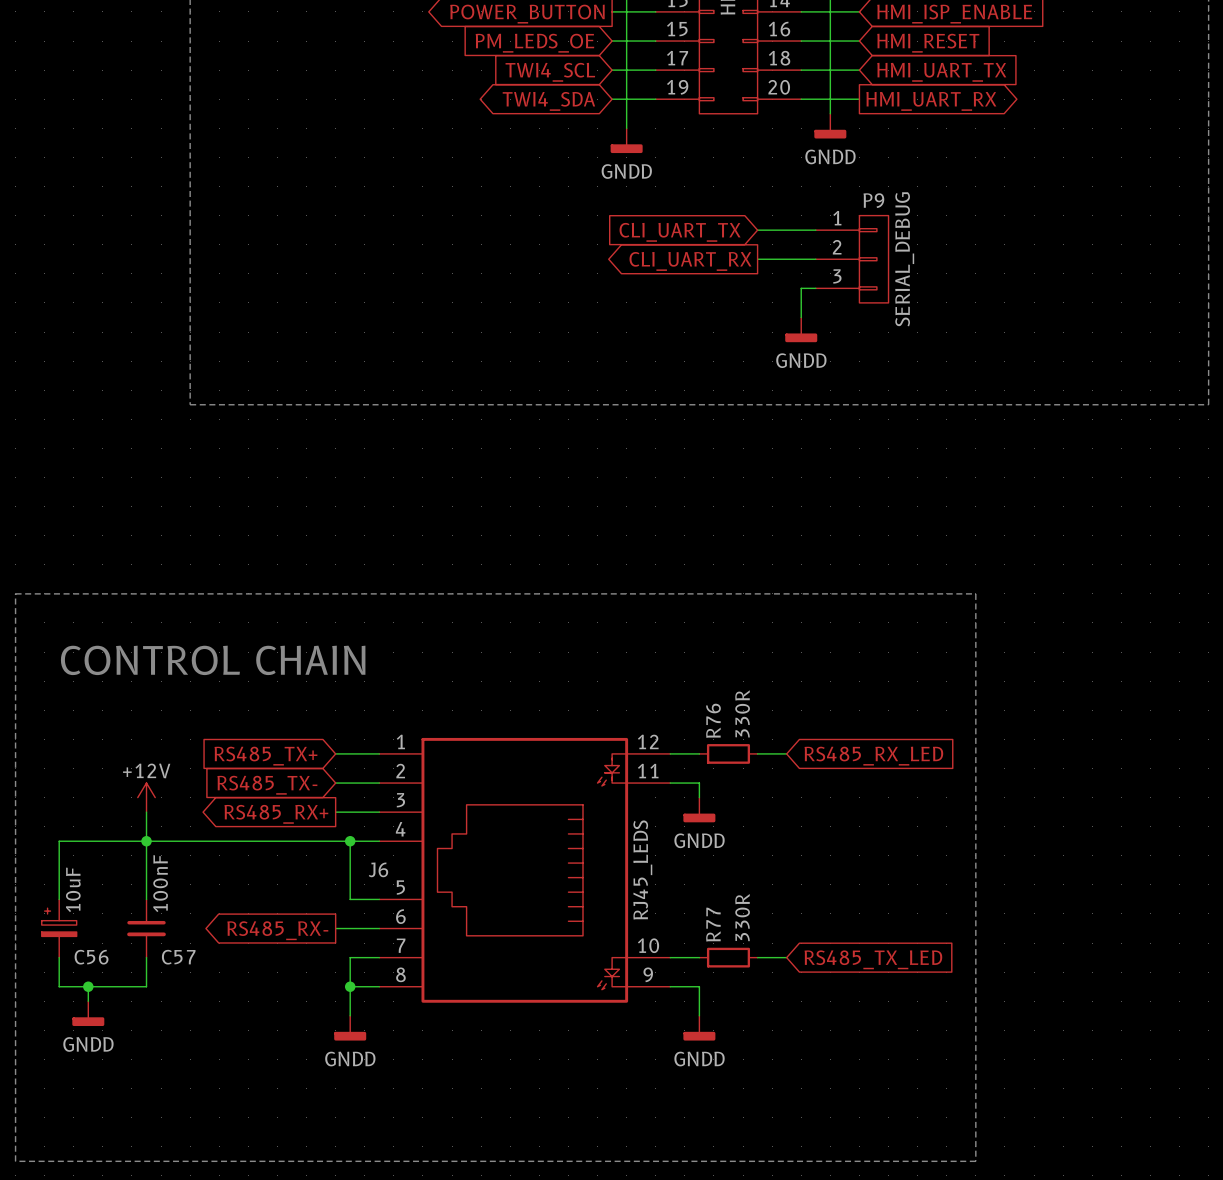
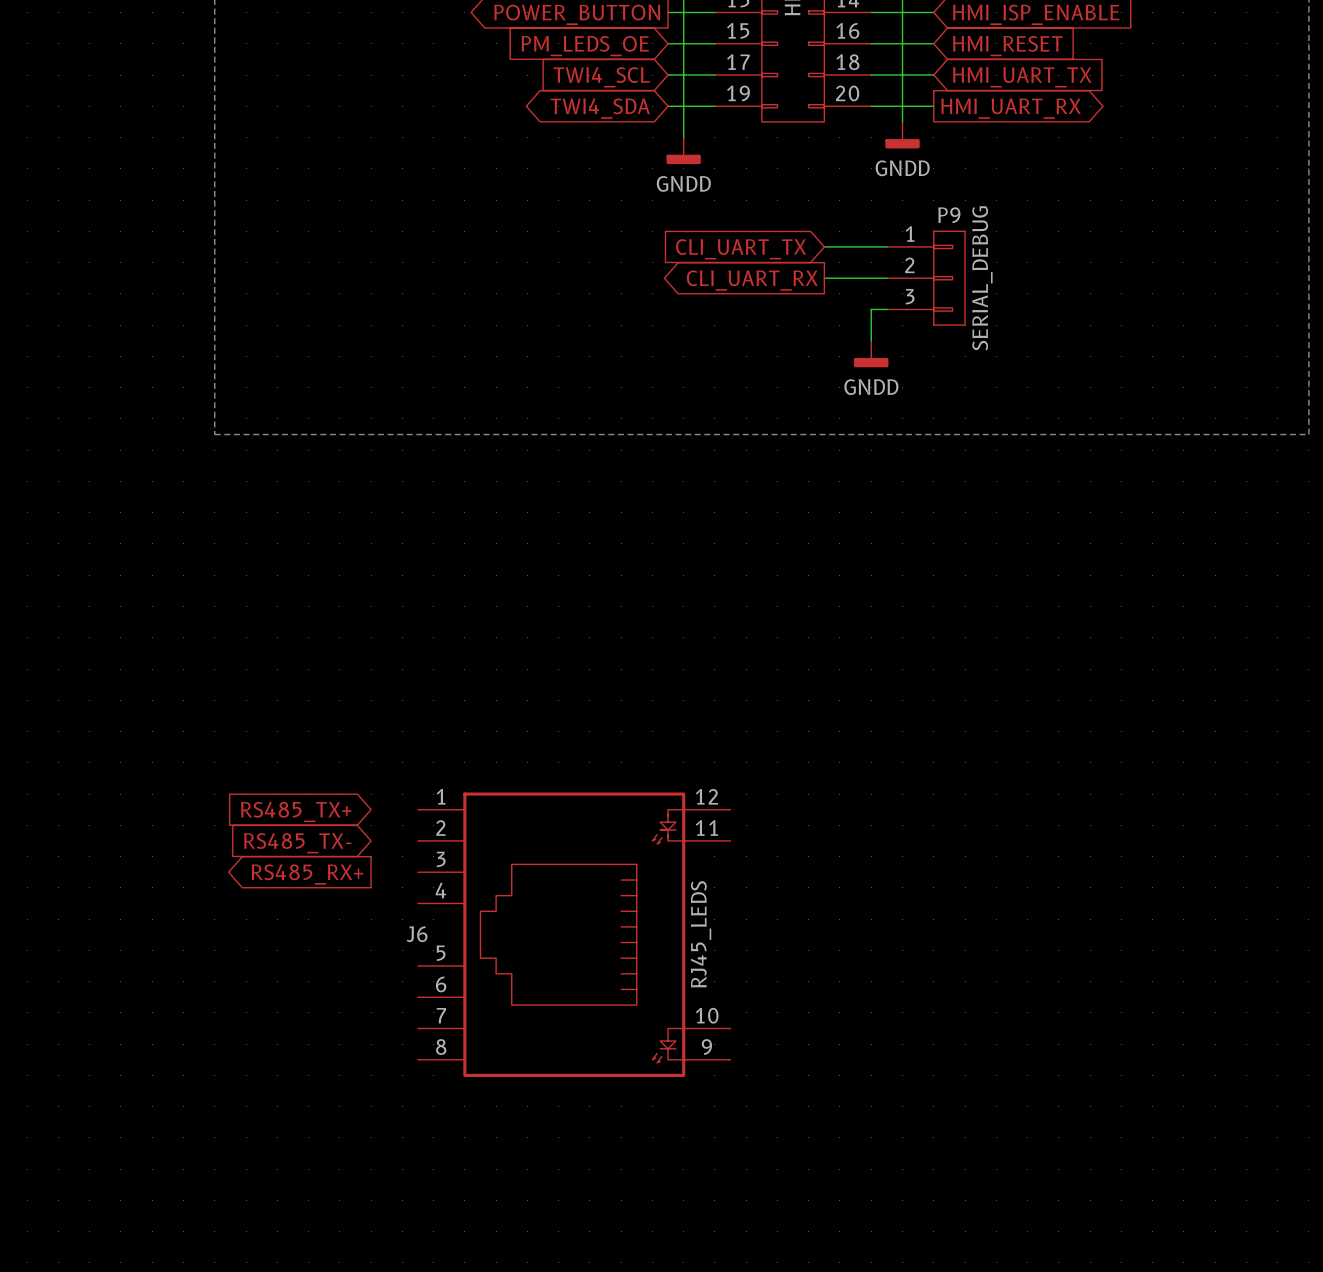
line: (15, 593) (975, 593) (975, 1161) (15, 1161) (15, 593) -> none
text: CONTROL CHAIN (213, 660) -> none
wire: (335, 753) (379, 753) -> none
wire: (670, 753) (699, 753) -> none
R76: 330R (728, 753) -> none
wire: (757, 753) (786, 753) -> none
global label: RS485_RX_LED (873, 756) -> none
wire: (335, 783) (379, 783) -> none
wire: (670, 783) (699, 783) (699, 797) -> none
power symbol: +12V (146, 797) -> none
power symbol: GNDD (699, 809) -> none
wire: (146, 812) (146, 899) -> none
wire: (335, 812) (379, 812) -> none
junction: (146, 841) -> none
wire: (350, 841) (350, 899) (379, 899) -> none
junction: (350, 841) -> none
wire: (379, 841) (59, 841) (59, 899) -> none
C56: 10uF (59, 928) -> none
C57: 100nF (146, 928) -> none
wire: (335, 928) (379, 928) -> none
global label: RS485_RX- (277, 930) -> none
wire: (59, 957) (59, 986) (146, 986) (146, 957) -> none
wire: (379, 957) (350, 957) (350, 1015) -> none
wire: (670, 957) (699, 957) -> none
R77: 330R (728, 957) -> none
wire: (757, 957) (786, 957) -> none
global label: RS485_TX_LED (873, 959) -> none
wire: (88, 986) (88, 1001) -> none
junction: (88, 986) -> none
wire: (350, 986) (379, 986) -> none
junction: (350, 986) -> none
wire: (670, 986) (699, 986) (699, 1015) -> none
power symbol: GNDD (88, 1013) -> none
power symbol: GNDD (350, 1028) -> none
power symbol: GNDD (699, 1028) -> none

